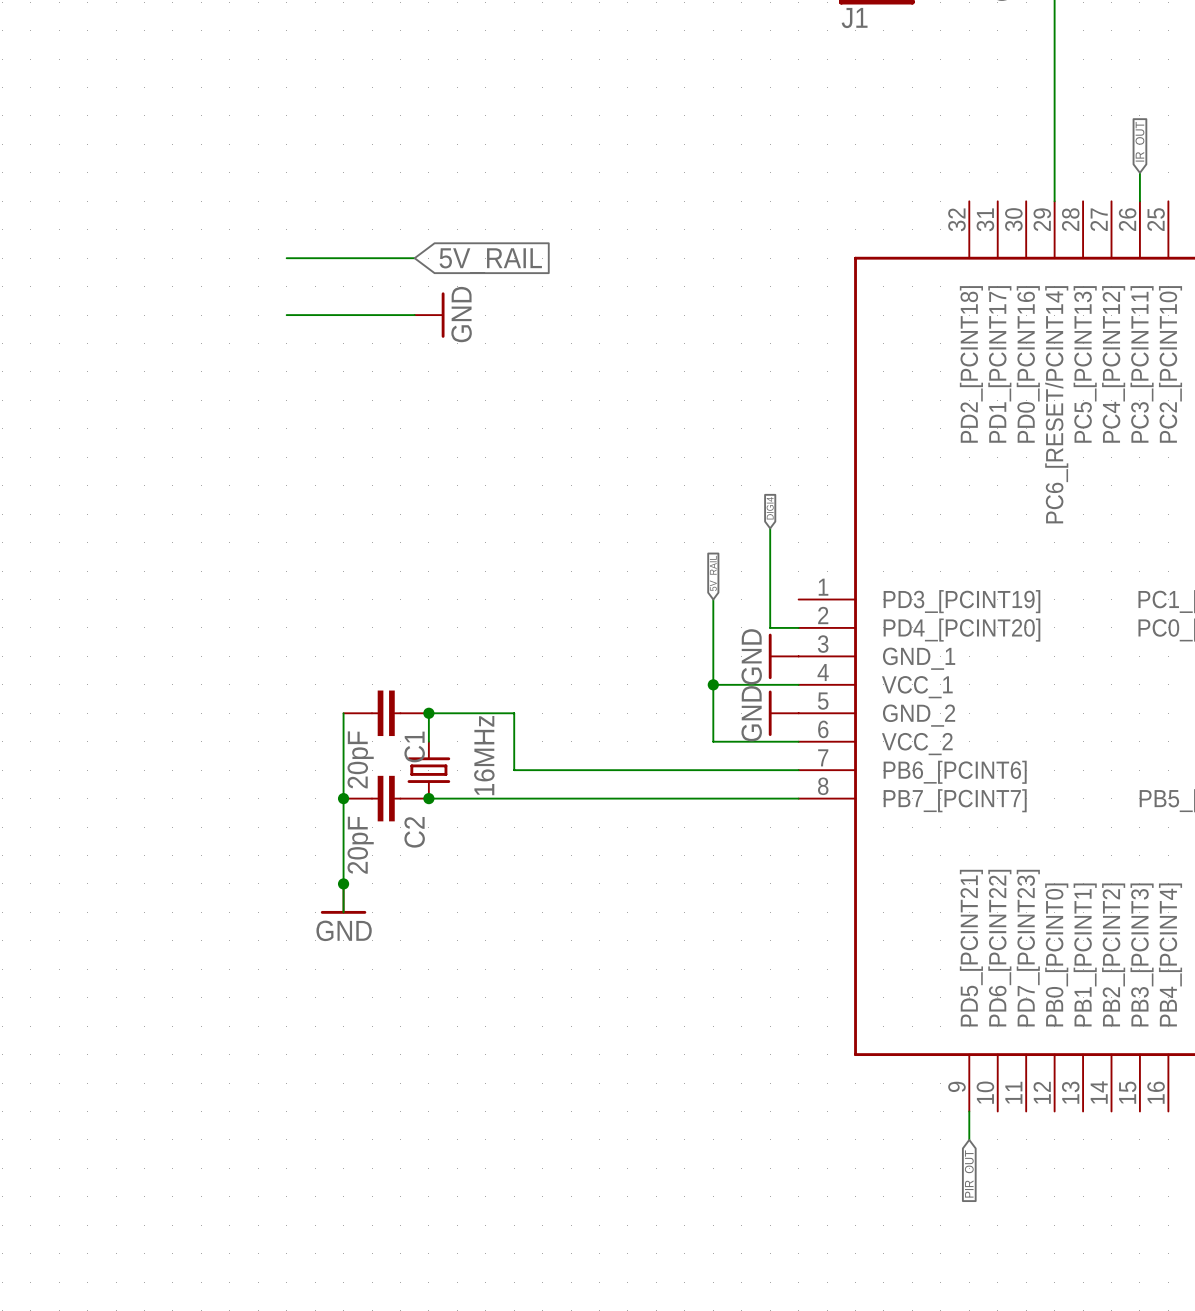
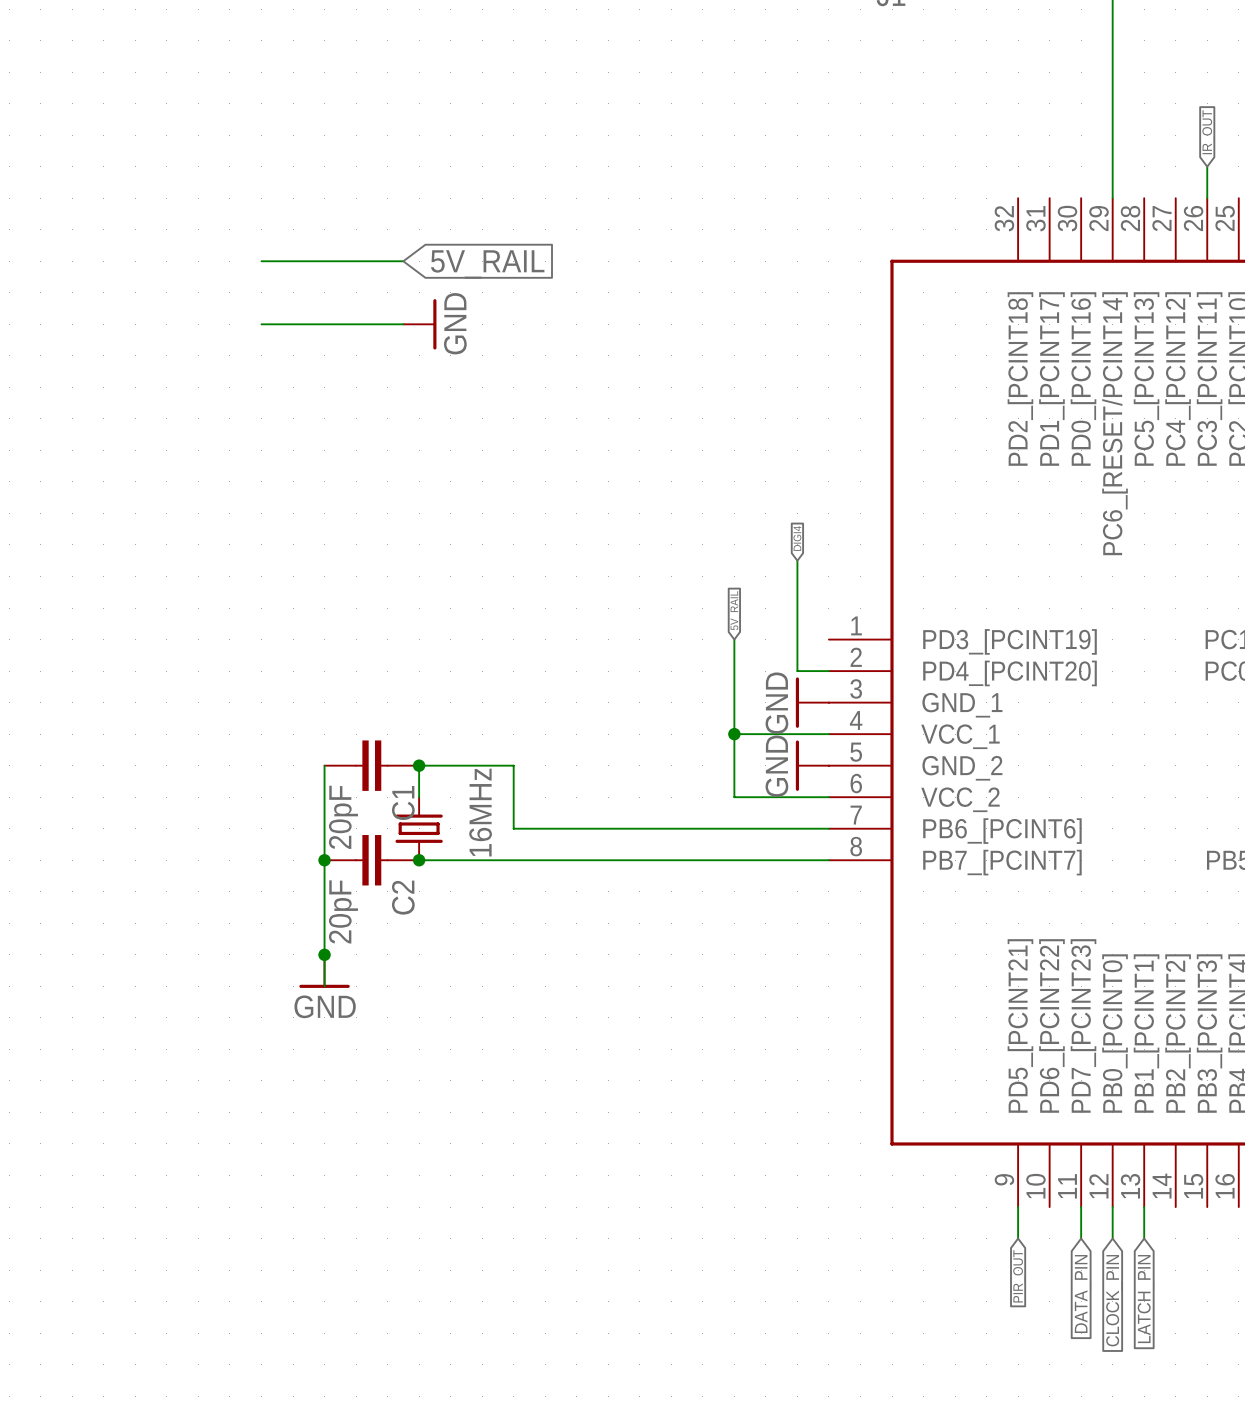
wire: none -> (1081, 1207) (1081, 1238)
wire: none -> (1112, 1207) (1112, 1238)
wire: none -> (1144, 1207) (1144, 1238)
global label: none -> DATA_PIN (1082, 1294)
global label: none -> LATCH_PIN (1145, 1299)
global label: none -> CLOCK_PIN (1114, 1300)

